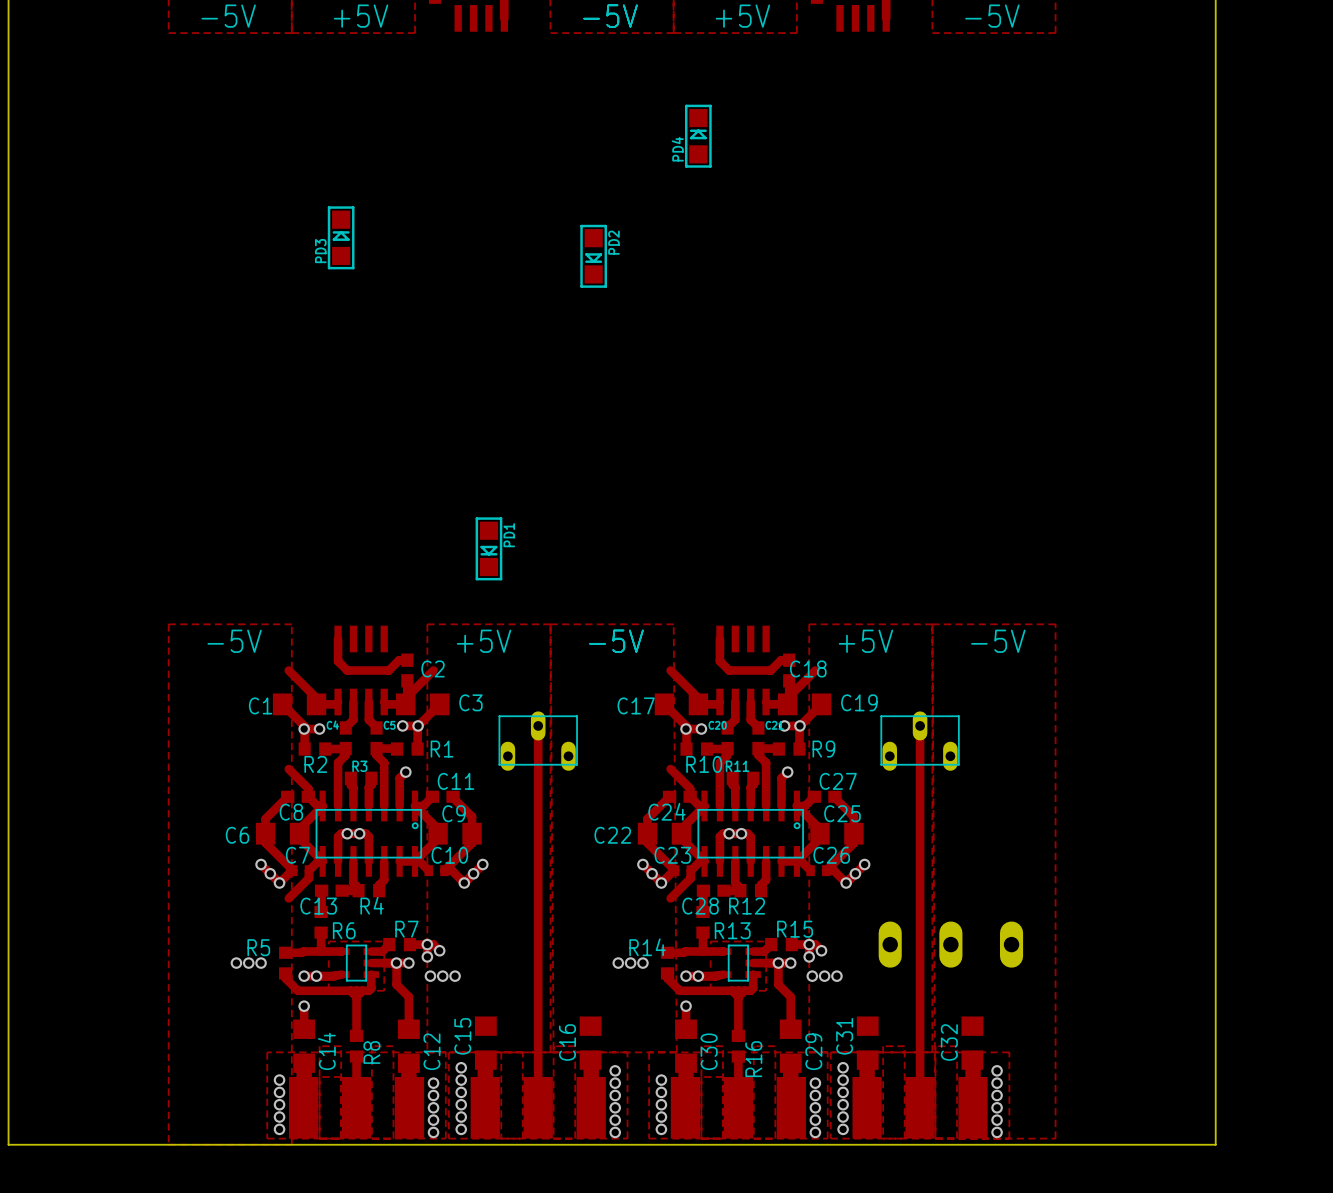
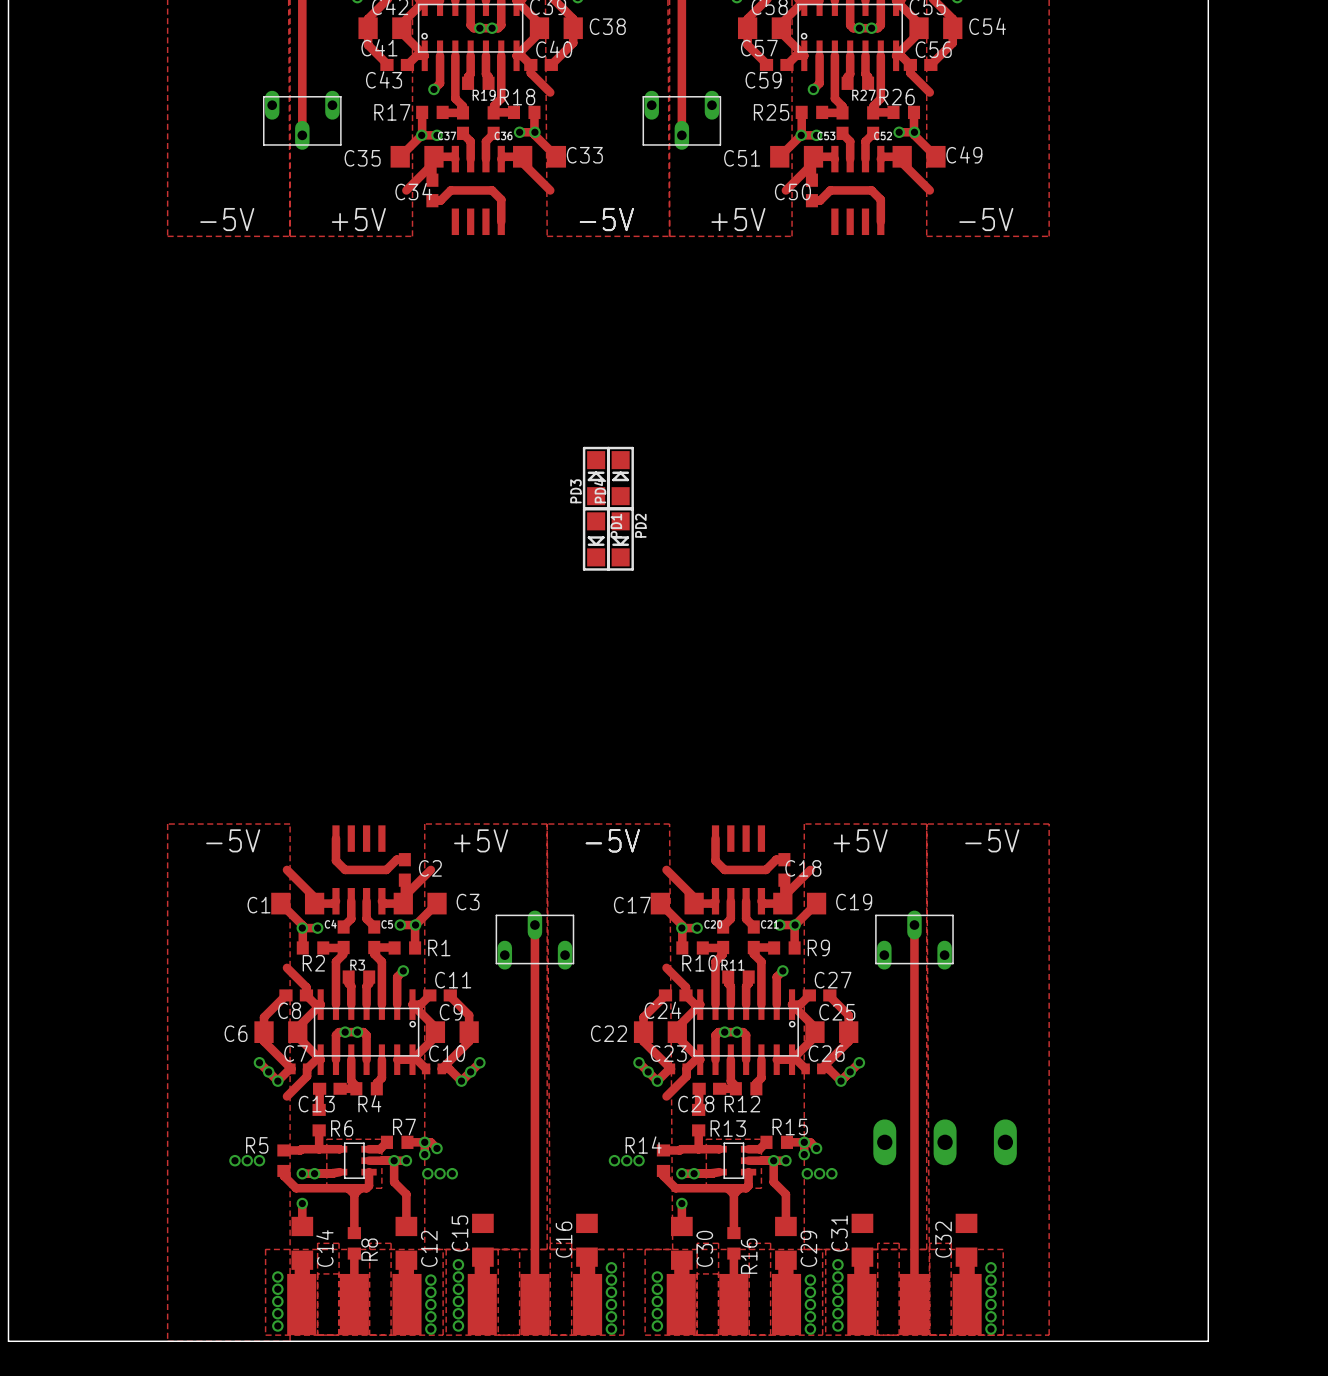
PD4 position: (698, 136) -> (620, 478)
PD3 position: (341, 237) -> (596, 478)
PD2 position: (593, 256) -> (620, 539)
PD1 position: (488, 548) -> (596, 539)

